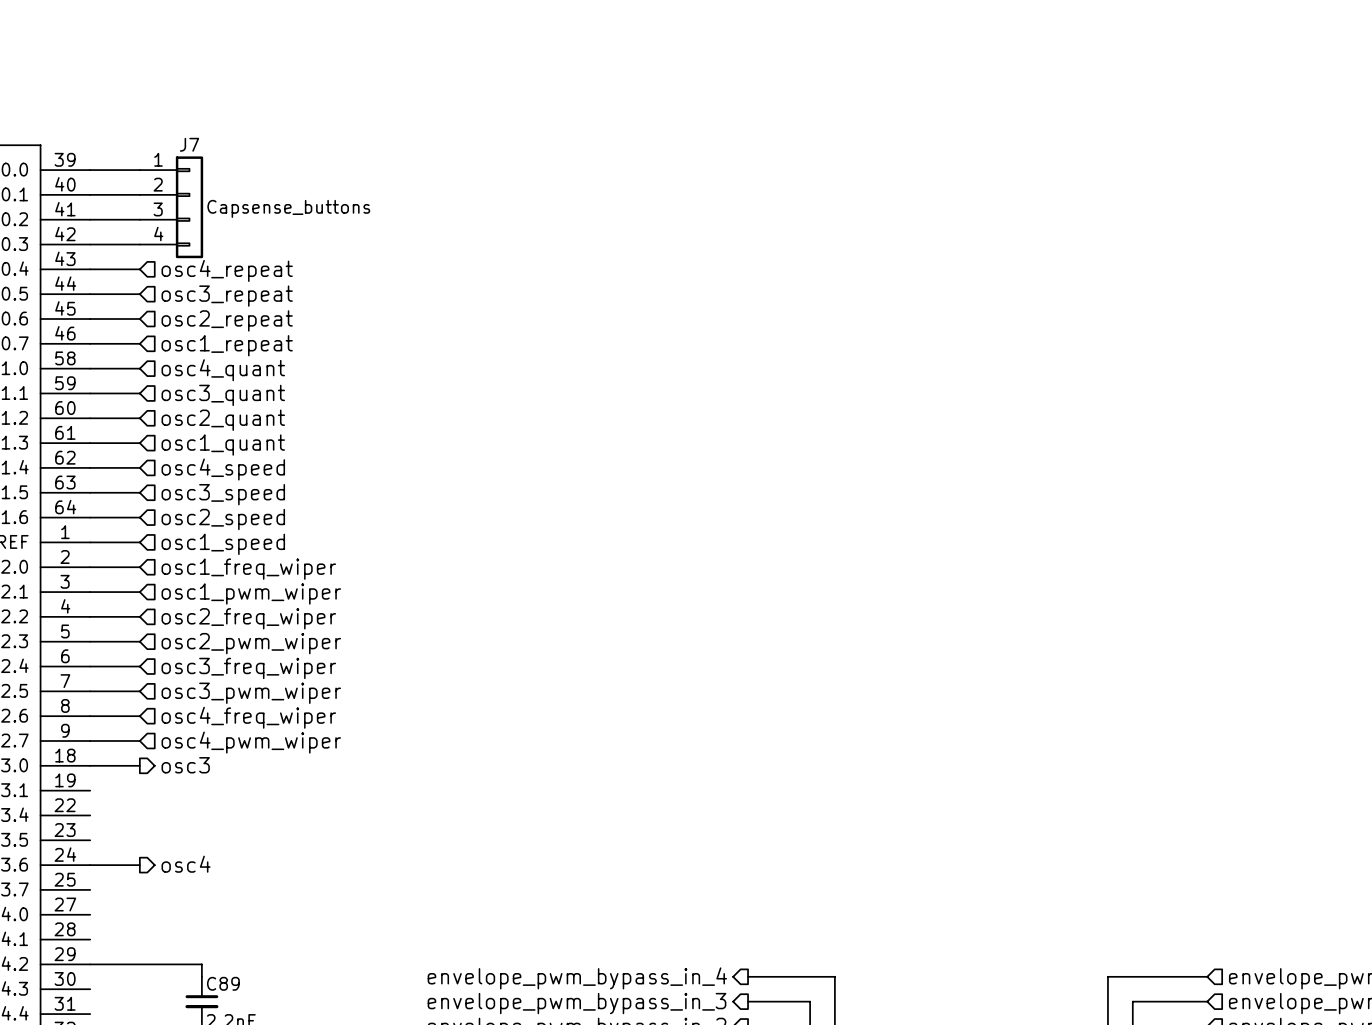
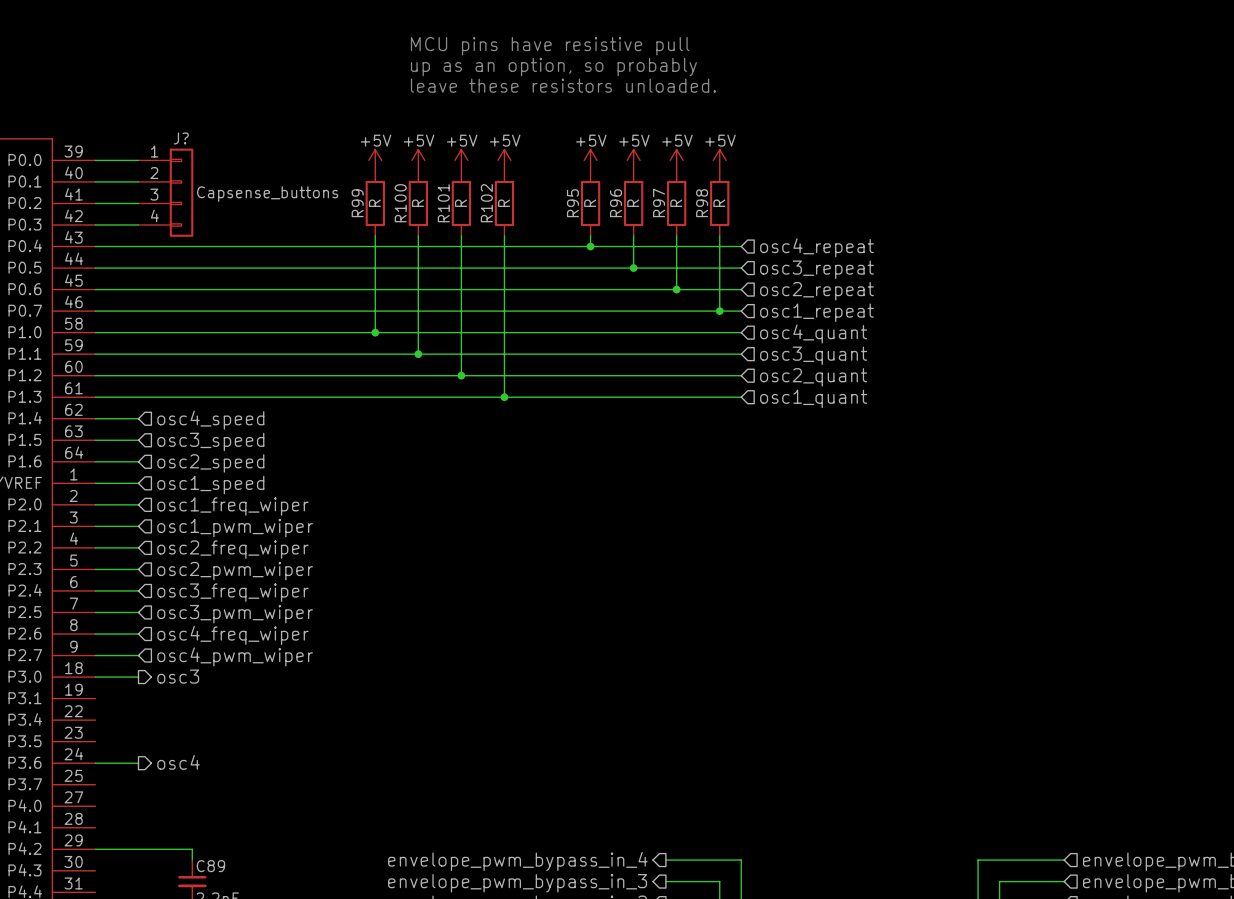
text: none -> MCU pins have resistive pull (550, 46)
text: none -> up as an option, so probably (553, 67)
text: none -> leave these resistors unloaded. (563, 85)
J7 name: J7 (189, 144) -> J? (181, 138)
power symbol: none -> +5V (375, 160)
power symbol: none -> +5V (418, 160)
power symbol: none -> +5V (461, 160)
power symbol: none -> +5V (504, 160)
power symbol: none -> +5V (590, 160)
power symbol: none -> +5V (633, 160)
power symbol: none -> +5V (676, 160)
power symbol: none -> +5V (719, 160)
R99: none -> R (375, 203)
R100: none -> R (418, 203)
R101: none -> R (461, 203)
R102: none -> R (504, 203)
R95: none -> R (590, 203)
R96: none -> R (633, 203)
R97: none -> R (676, 203)
R98: none -> R (719, 203)
wire: none -> (375, 235) (375, 332)
wire: none -> (418, 235) (418, 354)
wire: none -> (461, 235) (461, 375)
wire: none -> (504, 235) (504, 397)
wire: none -> (590, 235) (590, 246)
wire: none -> (633, 235) (633, 268)
wire: none -> (676, 235) (676, 289)
wire: none -> (719, 235) (719, 311)
wire: none -> (138, 246) (741, 246)
junction: none -> (590, 246)
hierarchical label: osc4_repeat (227, 270) -> none
hierarchical label: none -> osc4_repeat (816, 247)
wire: none -> (138, 268) (741, 268)
junction: none -> (633, 268)
hierarchical label: osc3_repeat (227, 296) -> none
hierarchical label: none -> osc3_repeat (816, 269)
wire: none -> (138, 289) (741, 289)
junction: none -> (676, 289)
hierarchical label: osc2_repeat (227, 320) -> none
hierarchical label: none -> osc2_repeat (816, 291)
wire: none -> (138, 311) (741, 311)
junction: none -> (719, 311)
hierarchical label: osc1_repeat (227, 345) -> none
hierarchical label: none -> osc1_repeat (816, 312)
wire: none -> (138, 332) (741, 332)
junction: none -> (375, 332)
hierarchical label: osc4_quant (223, 370) -> none
hierarchical label: none -> osc4_quant (813, 333)
wire: none -> (138, 354) (741, 354)
junction: none -> (418, 354)
hierarchical label: osc3_quant (223, 395) -> none
hierarchical label: none -> osc3_quant (813, 355)
wire: none -> (138, 375) (741, 375)
junction: none -> (461, 375)
hierarchical label: osc2_quant (223, 420) -> none
hierarchical label: none -> osc2_quant (813, 377)
wire: none -> (138, 397) (741, 397)
junction: none -> (504, 397)
hierarchical label: osc1_quant (223, 445) -> none
hierarchical label: none -> osc1_quant (813, 398)

